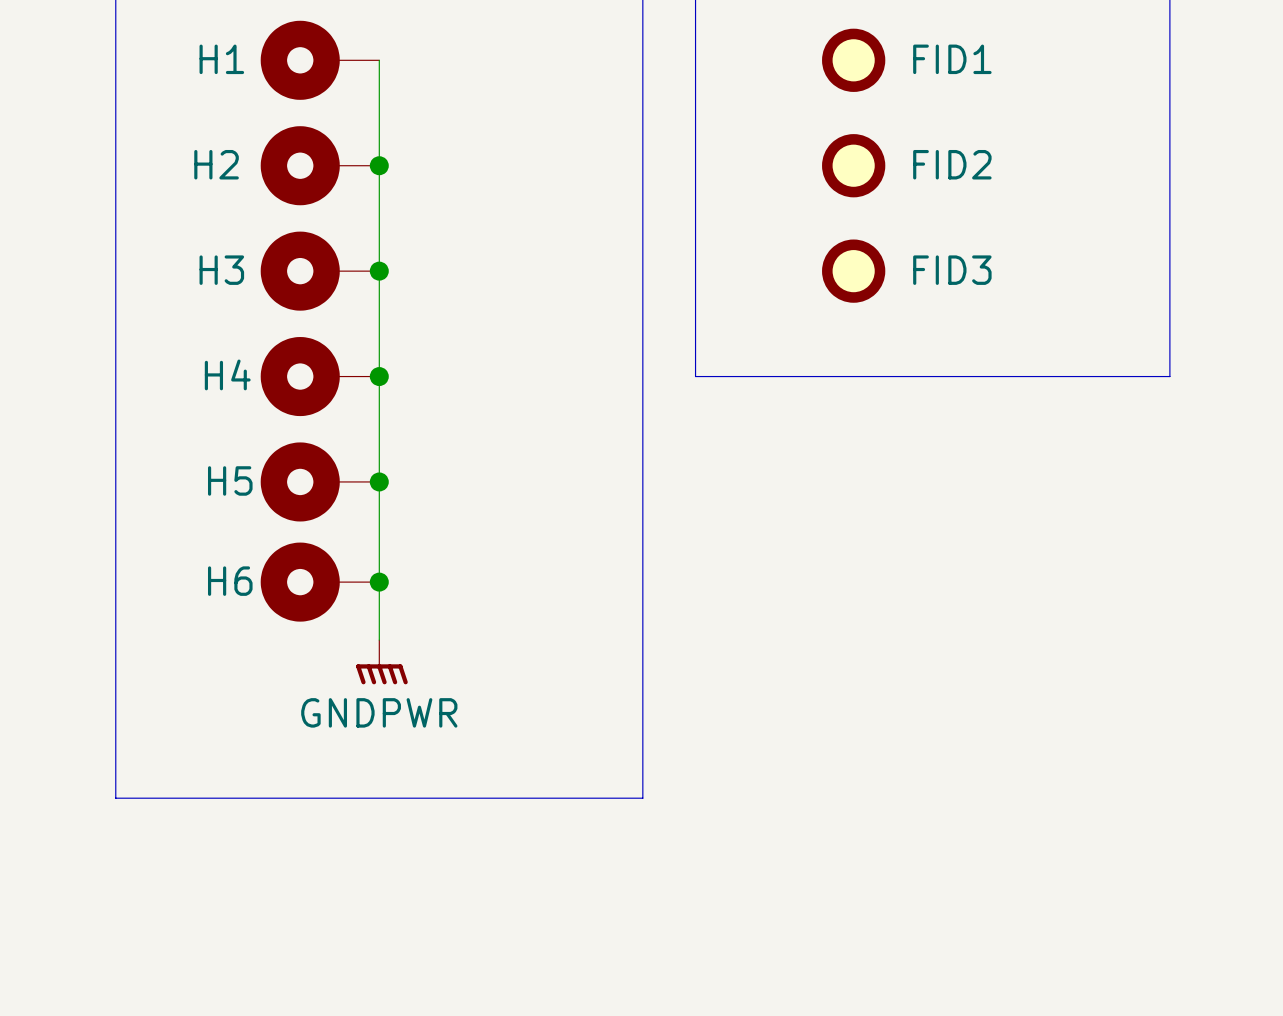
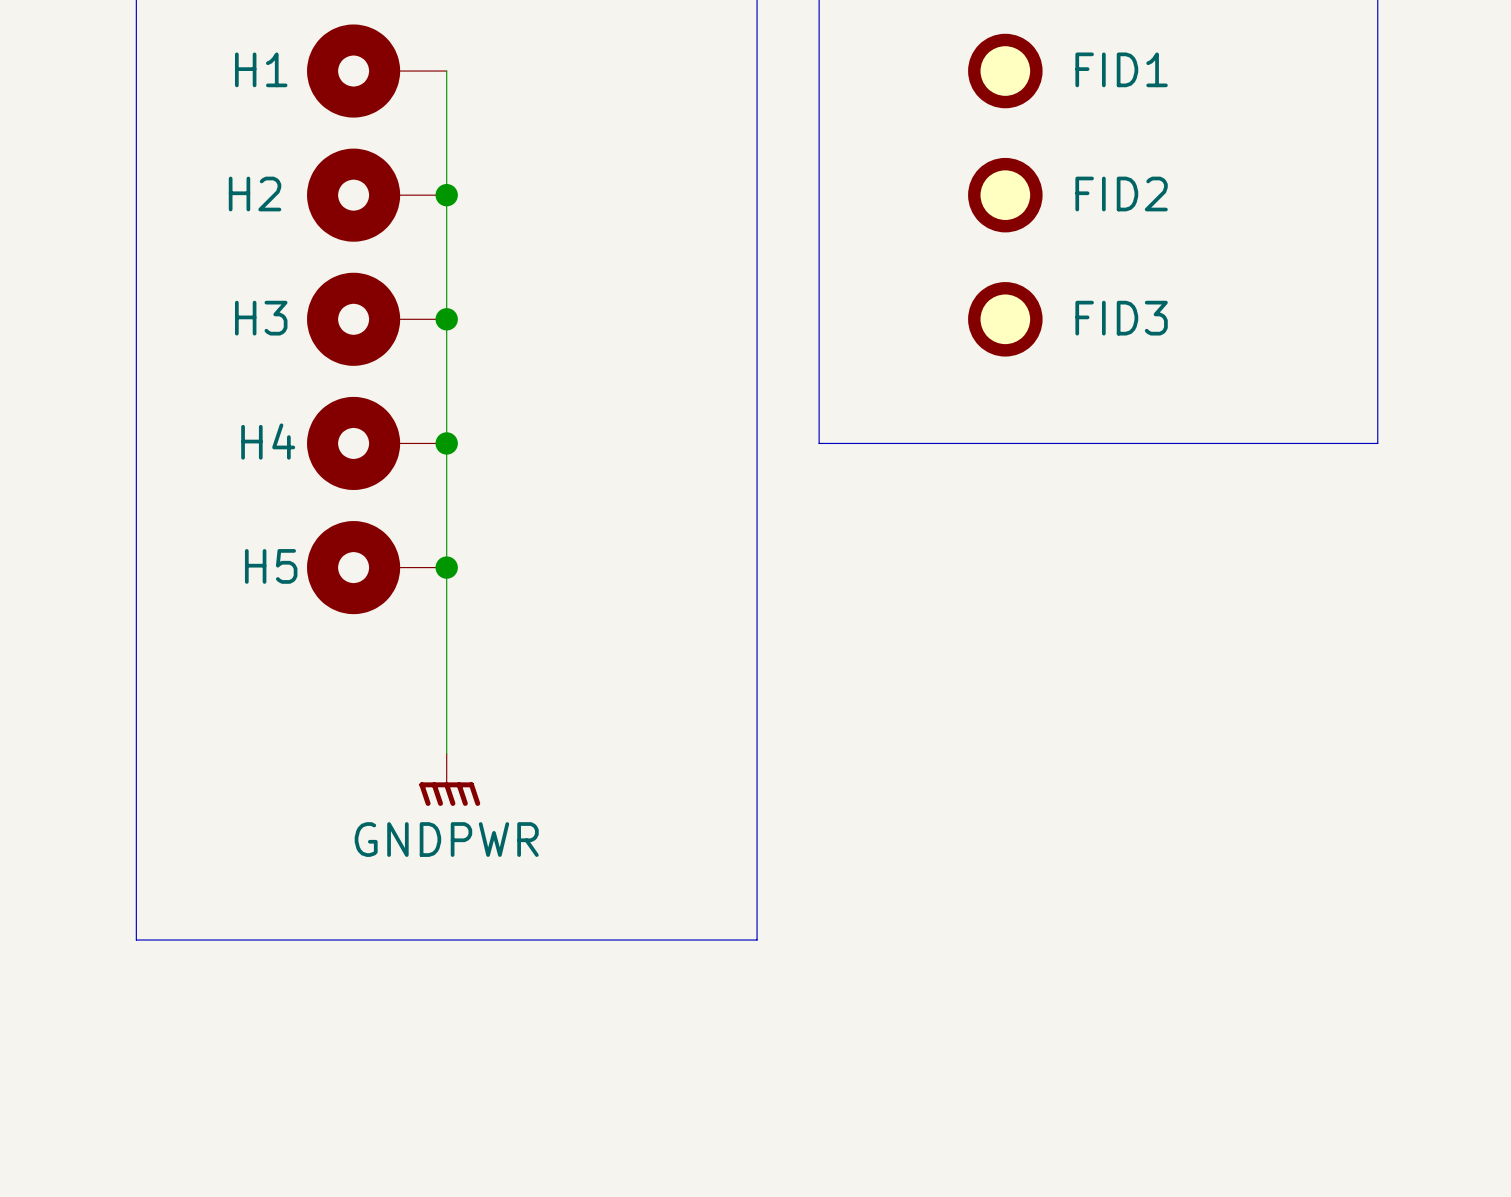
H6: (320, 582) -> none
junction: (379, 582) -> none

